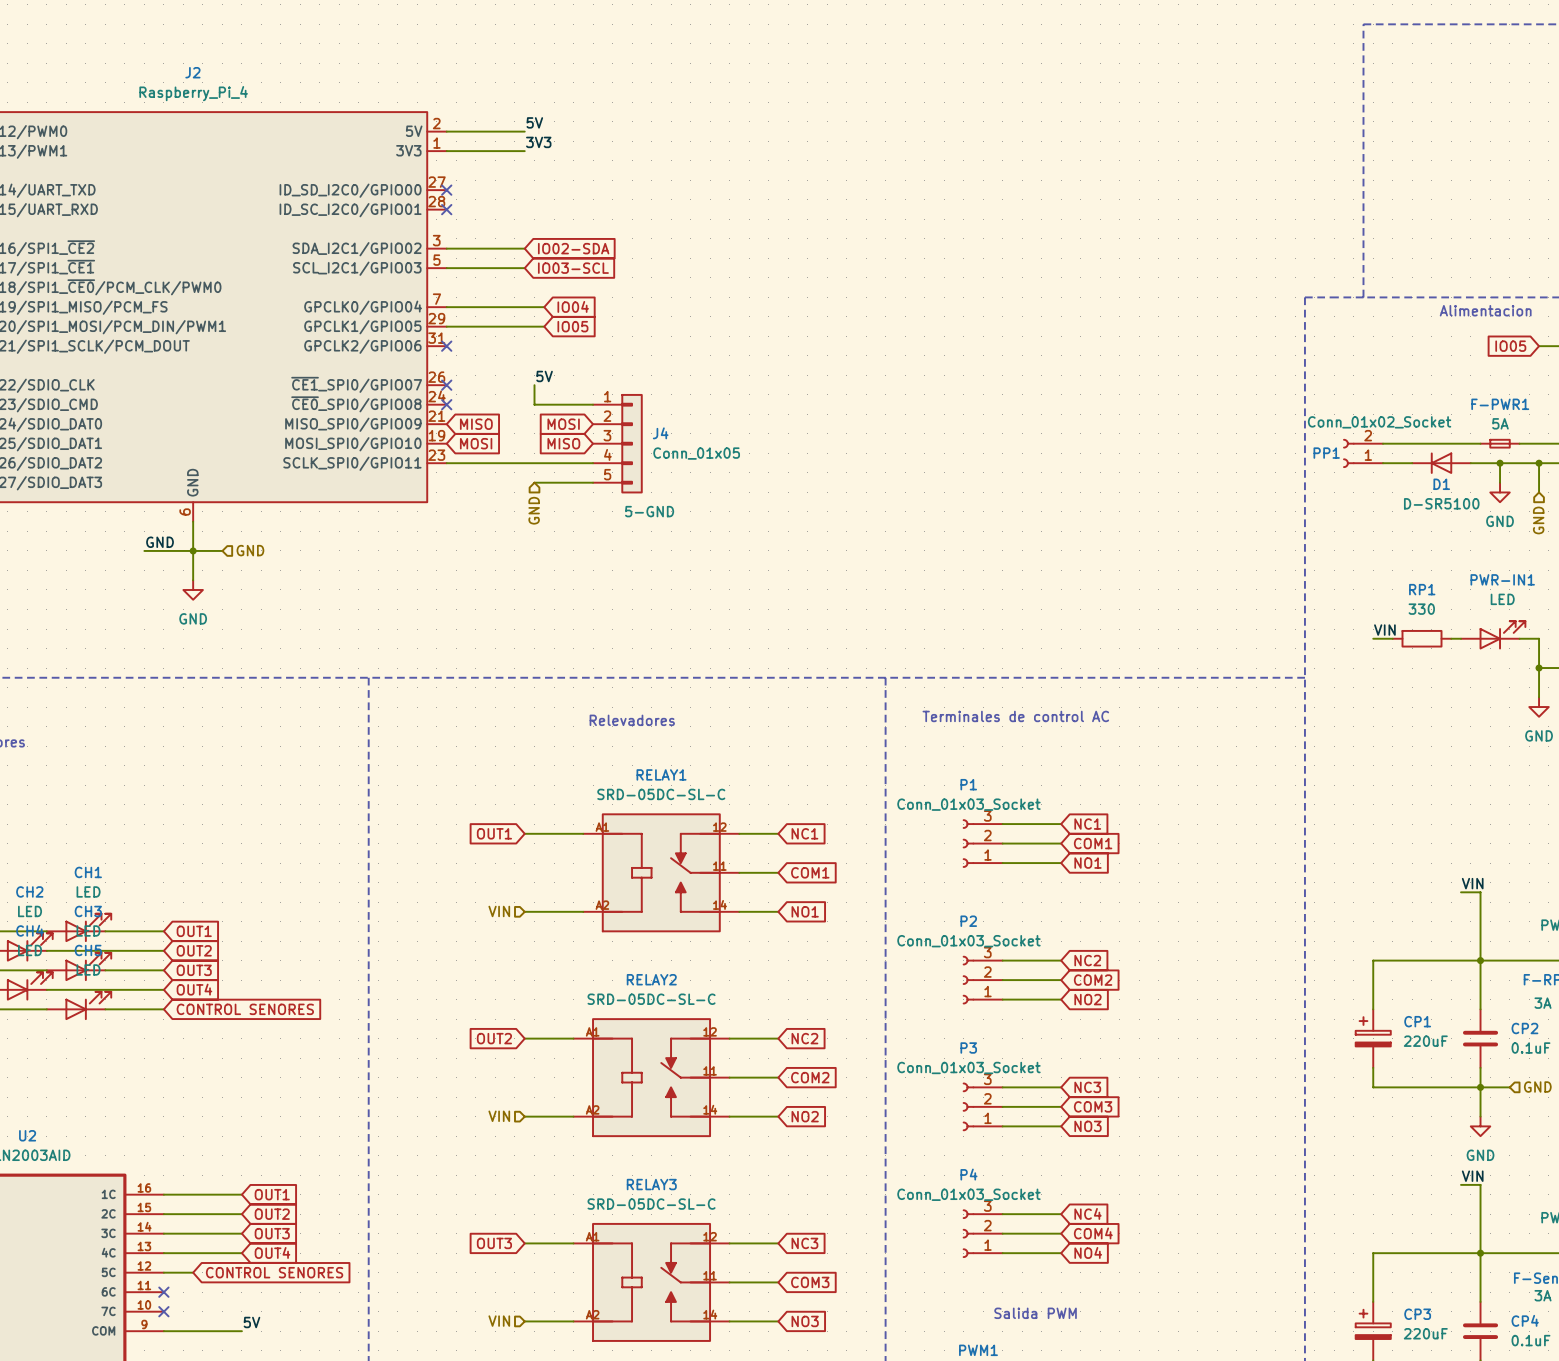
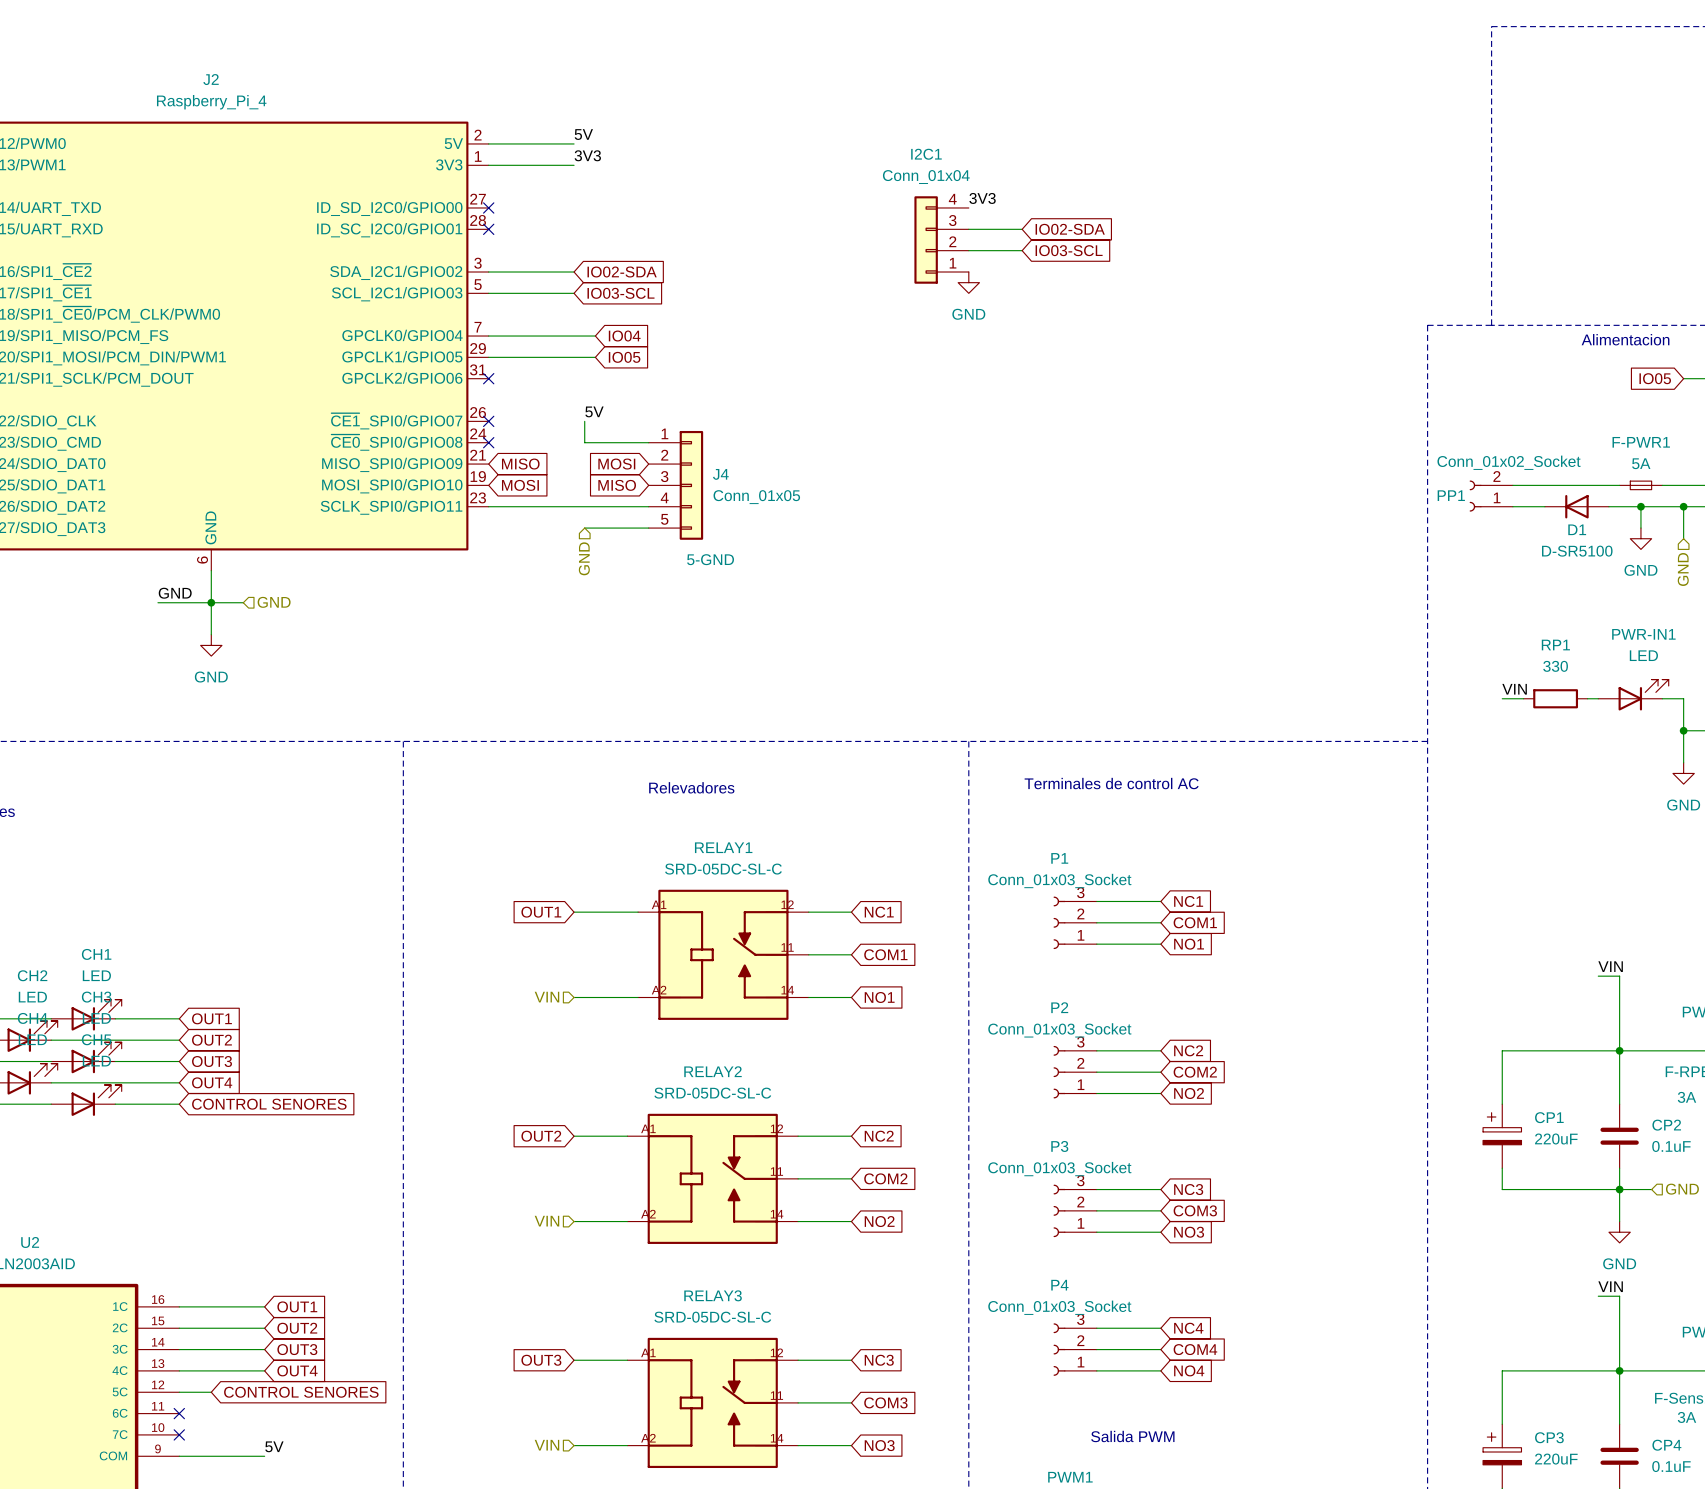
label: none -> 3V3 (982, 198)
wire: none -> (968, 229) (1022, 229)
global label: none -> IO02-SDA (1070, 229)
I2C1: none -> Conn_01x04 (941, 239)
wire: none -> (968, 250) (1022, 250)
global label: none -> IO03-SCL (1069, 250)
power symbol: none -> GND (968, 282)

